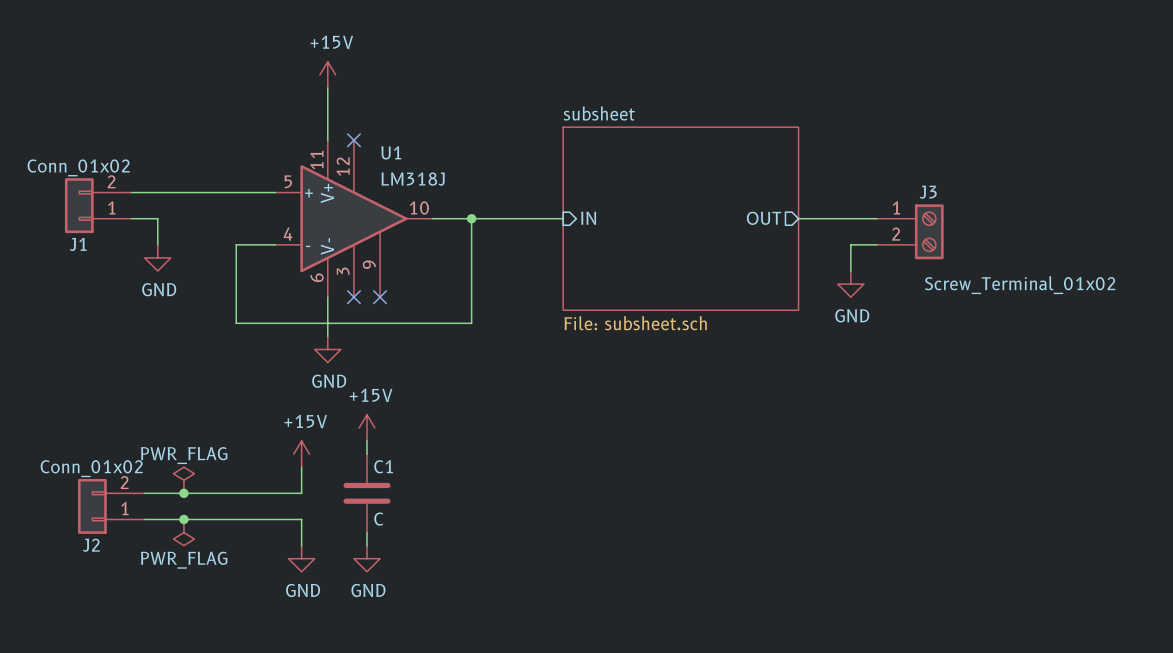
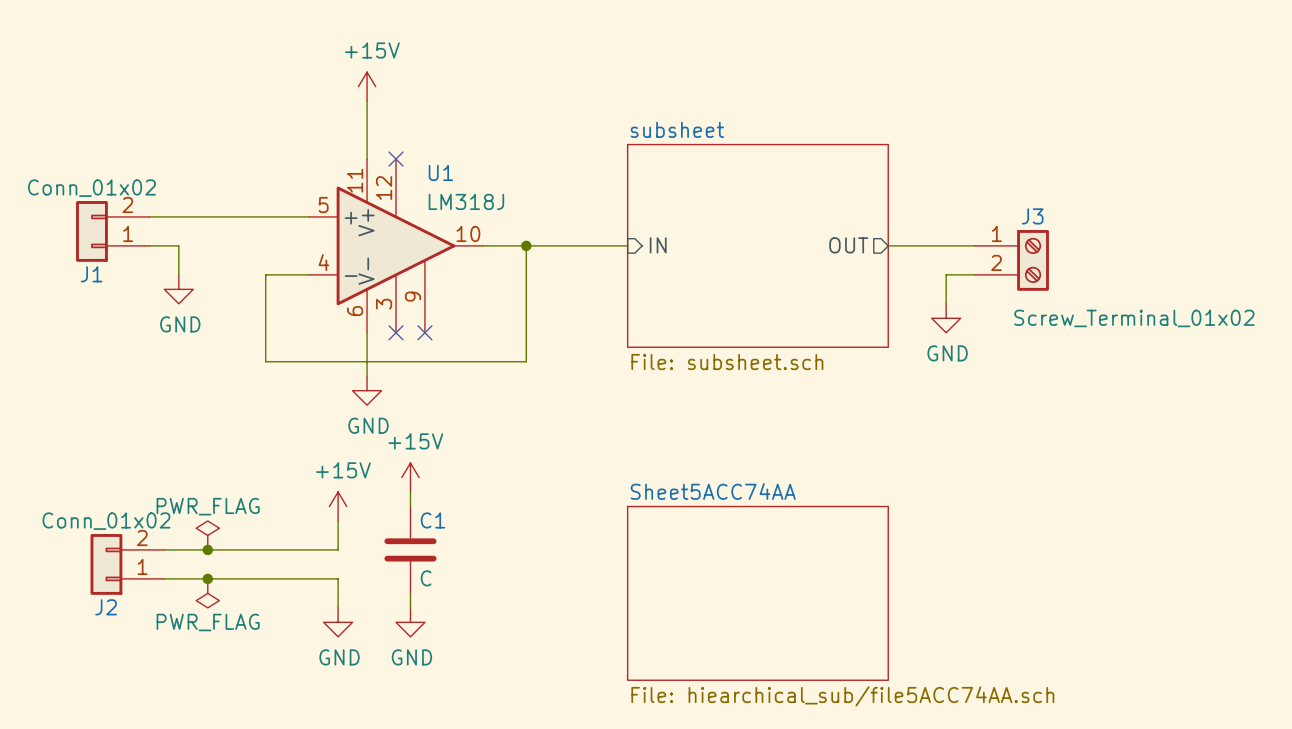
sheet Sheet5ACC74AA: none -> File: hiearchical_sub/file5ACC74AA.sch (757, 593)

